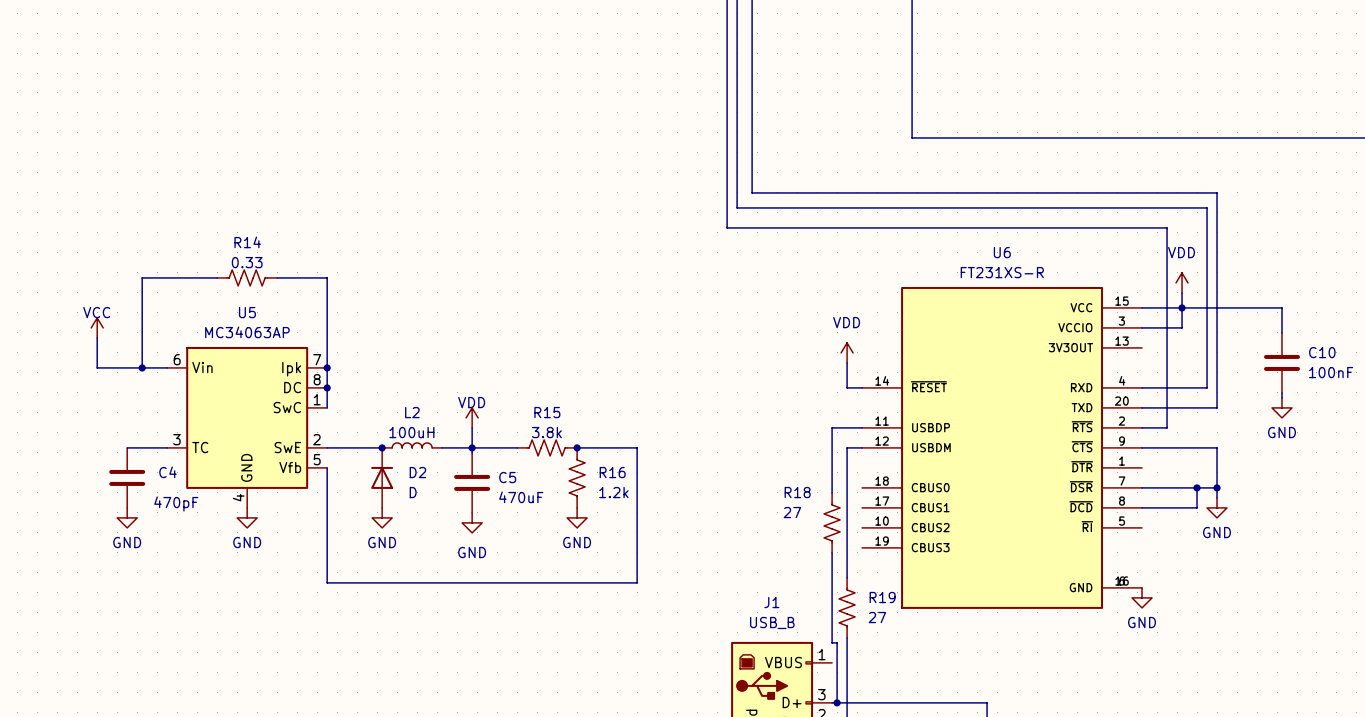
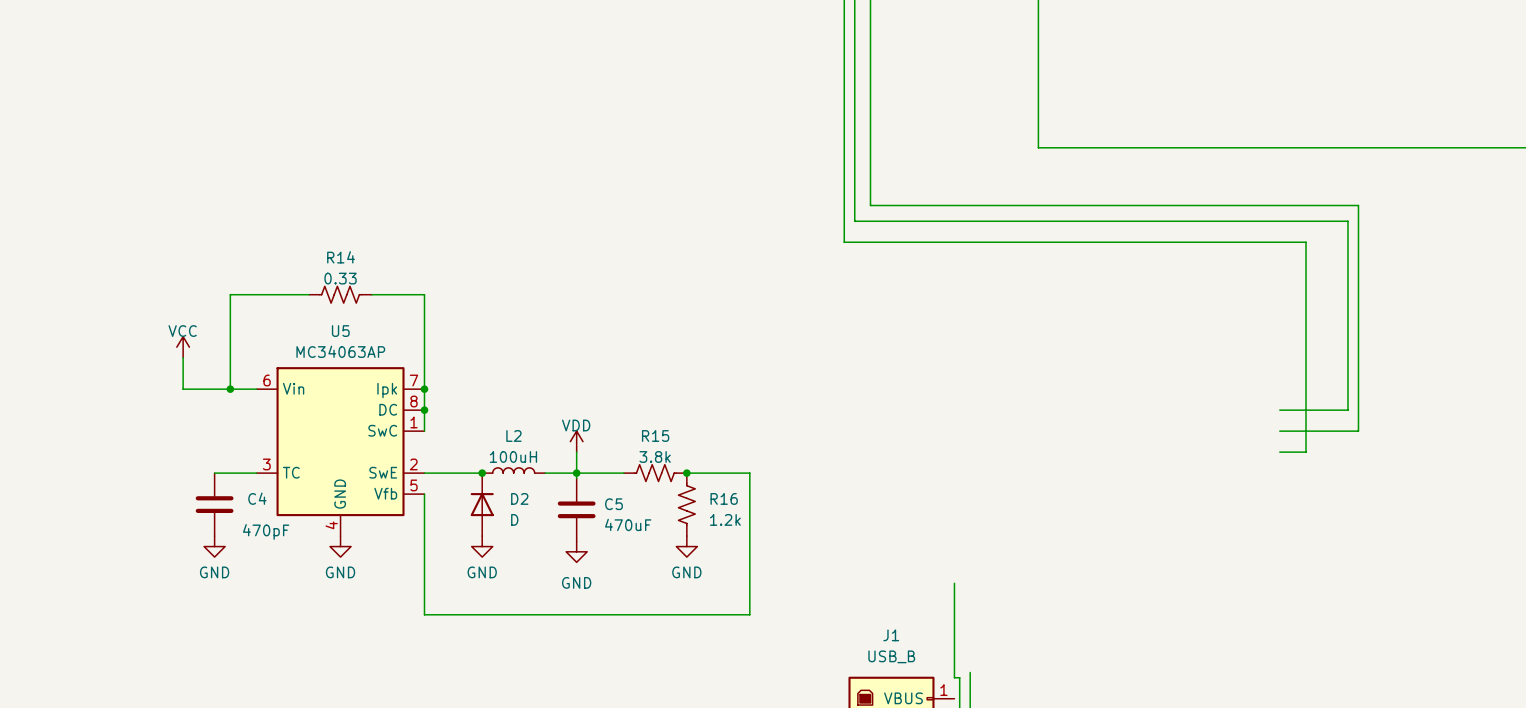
power symbol: VDD (1182, 282) -> none
wire: (1182, 292) (1182, 327) (1142, 327) -> none
wire: (1142, 307) (1282, 307) (1282, 332) -> none
junction: (1182, 307) -> none
power symbol: VDD (847, 352) -> none
wire: (847, 362) (847, 387) (862, 387) -> none
C10: 100nF (1282, 362) -> none
wire: (1282, 392) (1282, 397) -> none
power symbol: GND (1282, 407) -> none
wire: (862, 427) (832, 427) (832, 492) -> none
wire: (862, 447) (847, 447) (847, 577) -> none
U6: FT231XS-R (1002, 447) -> none
wire: (1142, 447) (1217, 447) (1217, 497) -> none
wire: (1142, 487) (1217, 487) -> none
wire: (1197, 487) (1197, 507) (1142, 507) -> none
junction: (1197, 487) -> none
junction: (1217, 487) -> none
power symbol: GND (1217, 507) -> none
R18: 27 (832, 522) -> none
power symbol: GND (1142, 597) -> none
R19: 27 (847, 607) -> none

